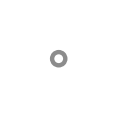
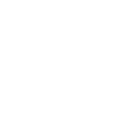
via: (58, 58) -> none

